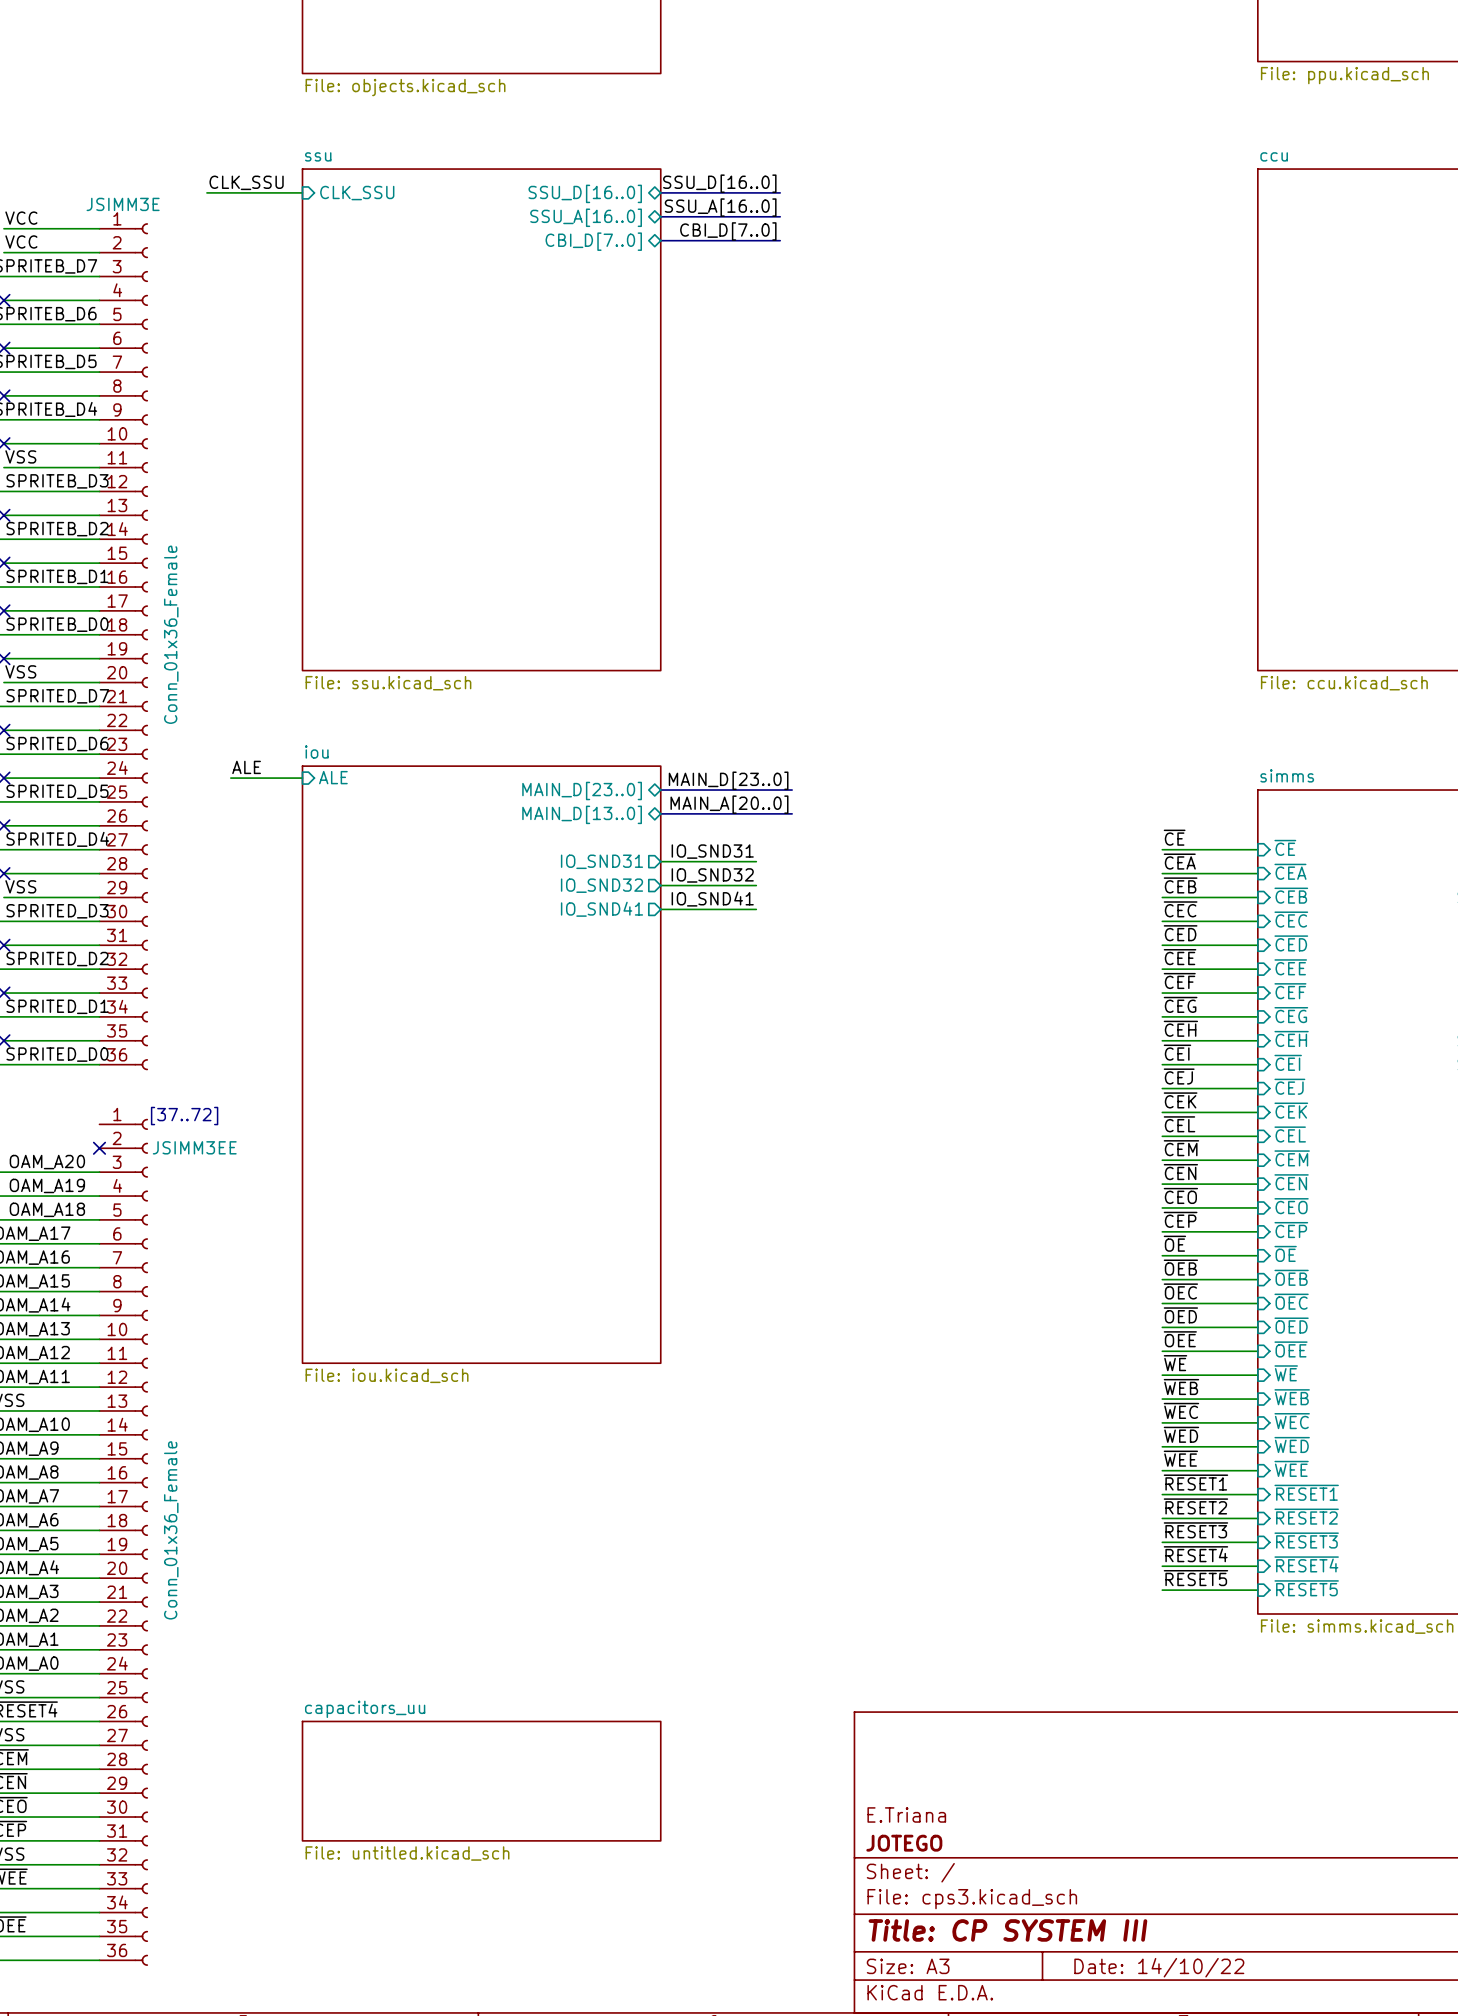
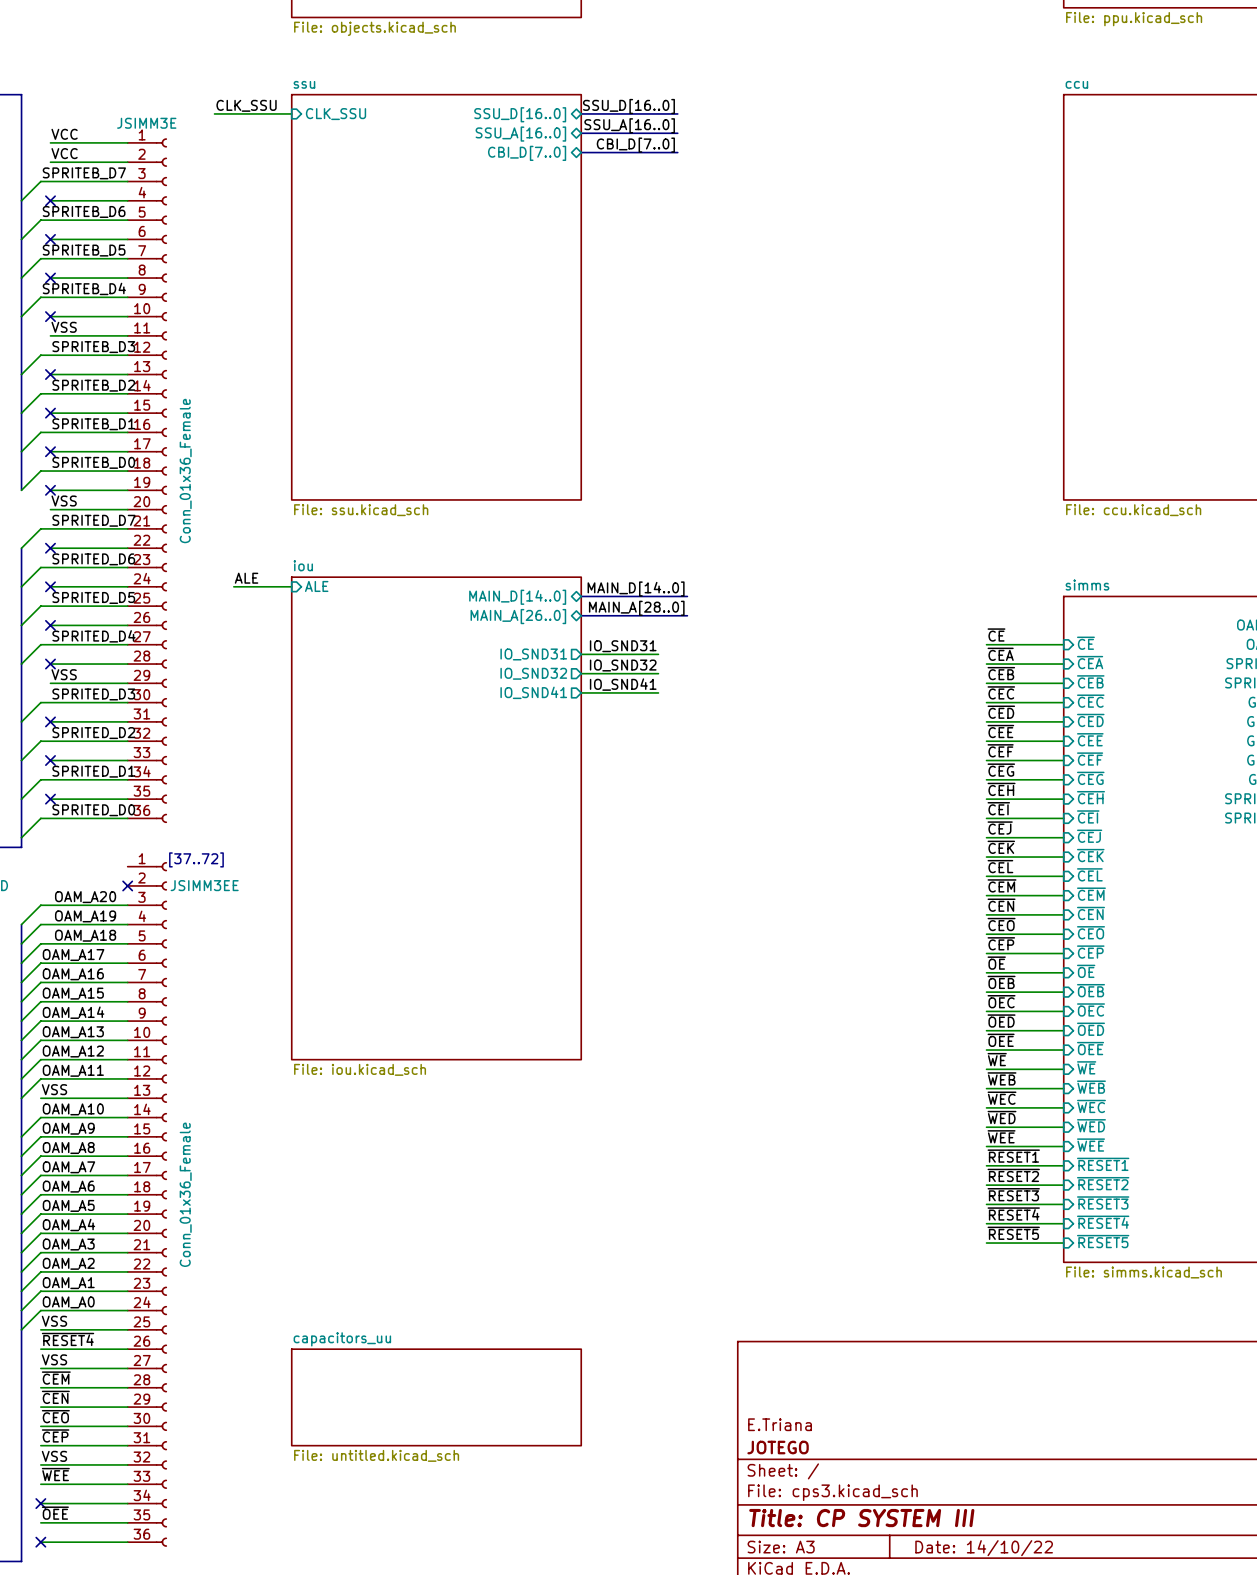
label: MAIN_D[23..0] (728, 780) -> MAIN_D[14..0] (636, 589)
sheet pin: MAIN_D[23..0] (582, 790) -> MAIN_D[14..0] (517, 597)
label: MAIN_A[20..0] (729, 804) -> MAIN_A[28..0] (636, 608)
sheet pin: MAIN_D[13..0] (582, 814) -> MAIN_A[26..0] (518, 616)

